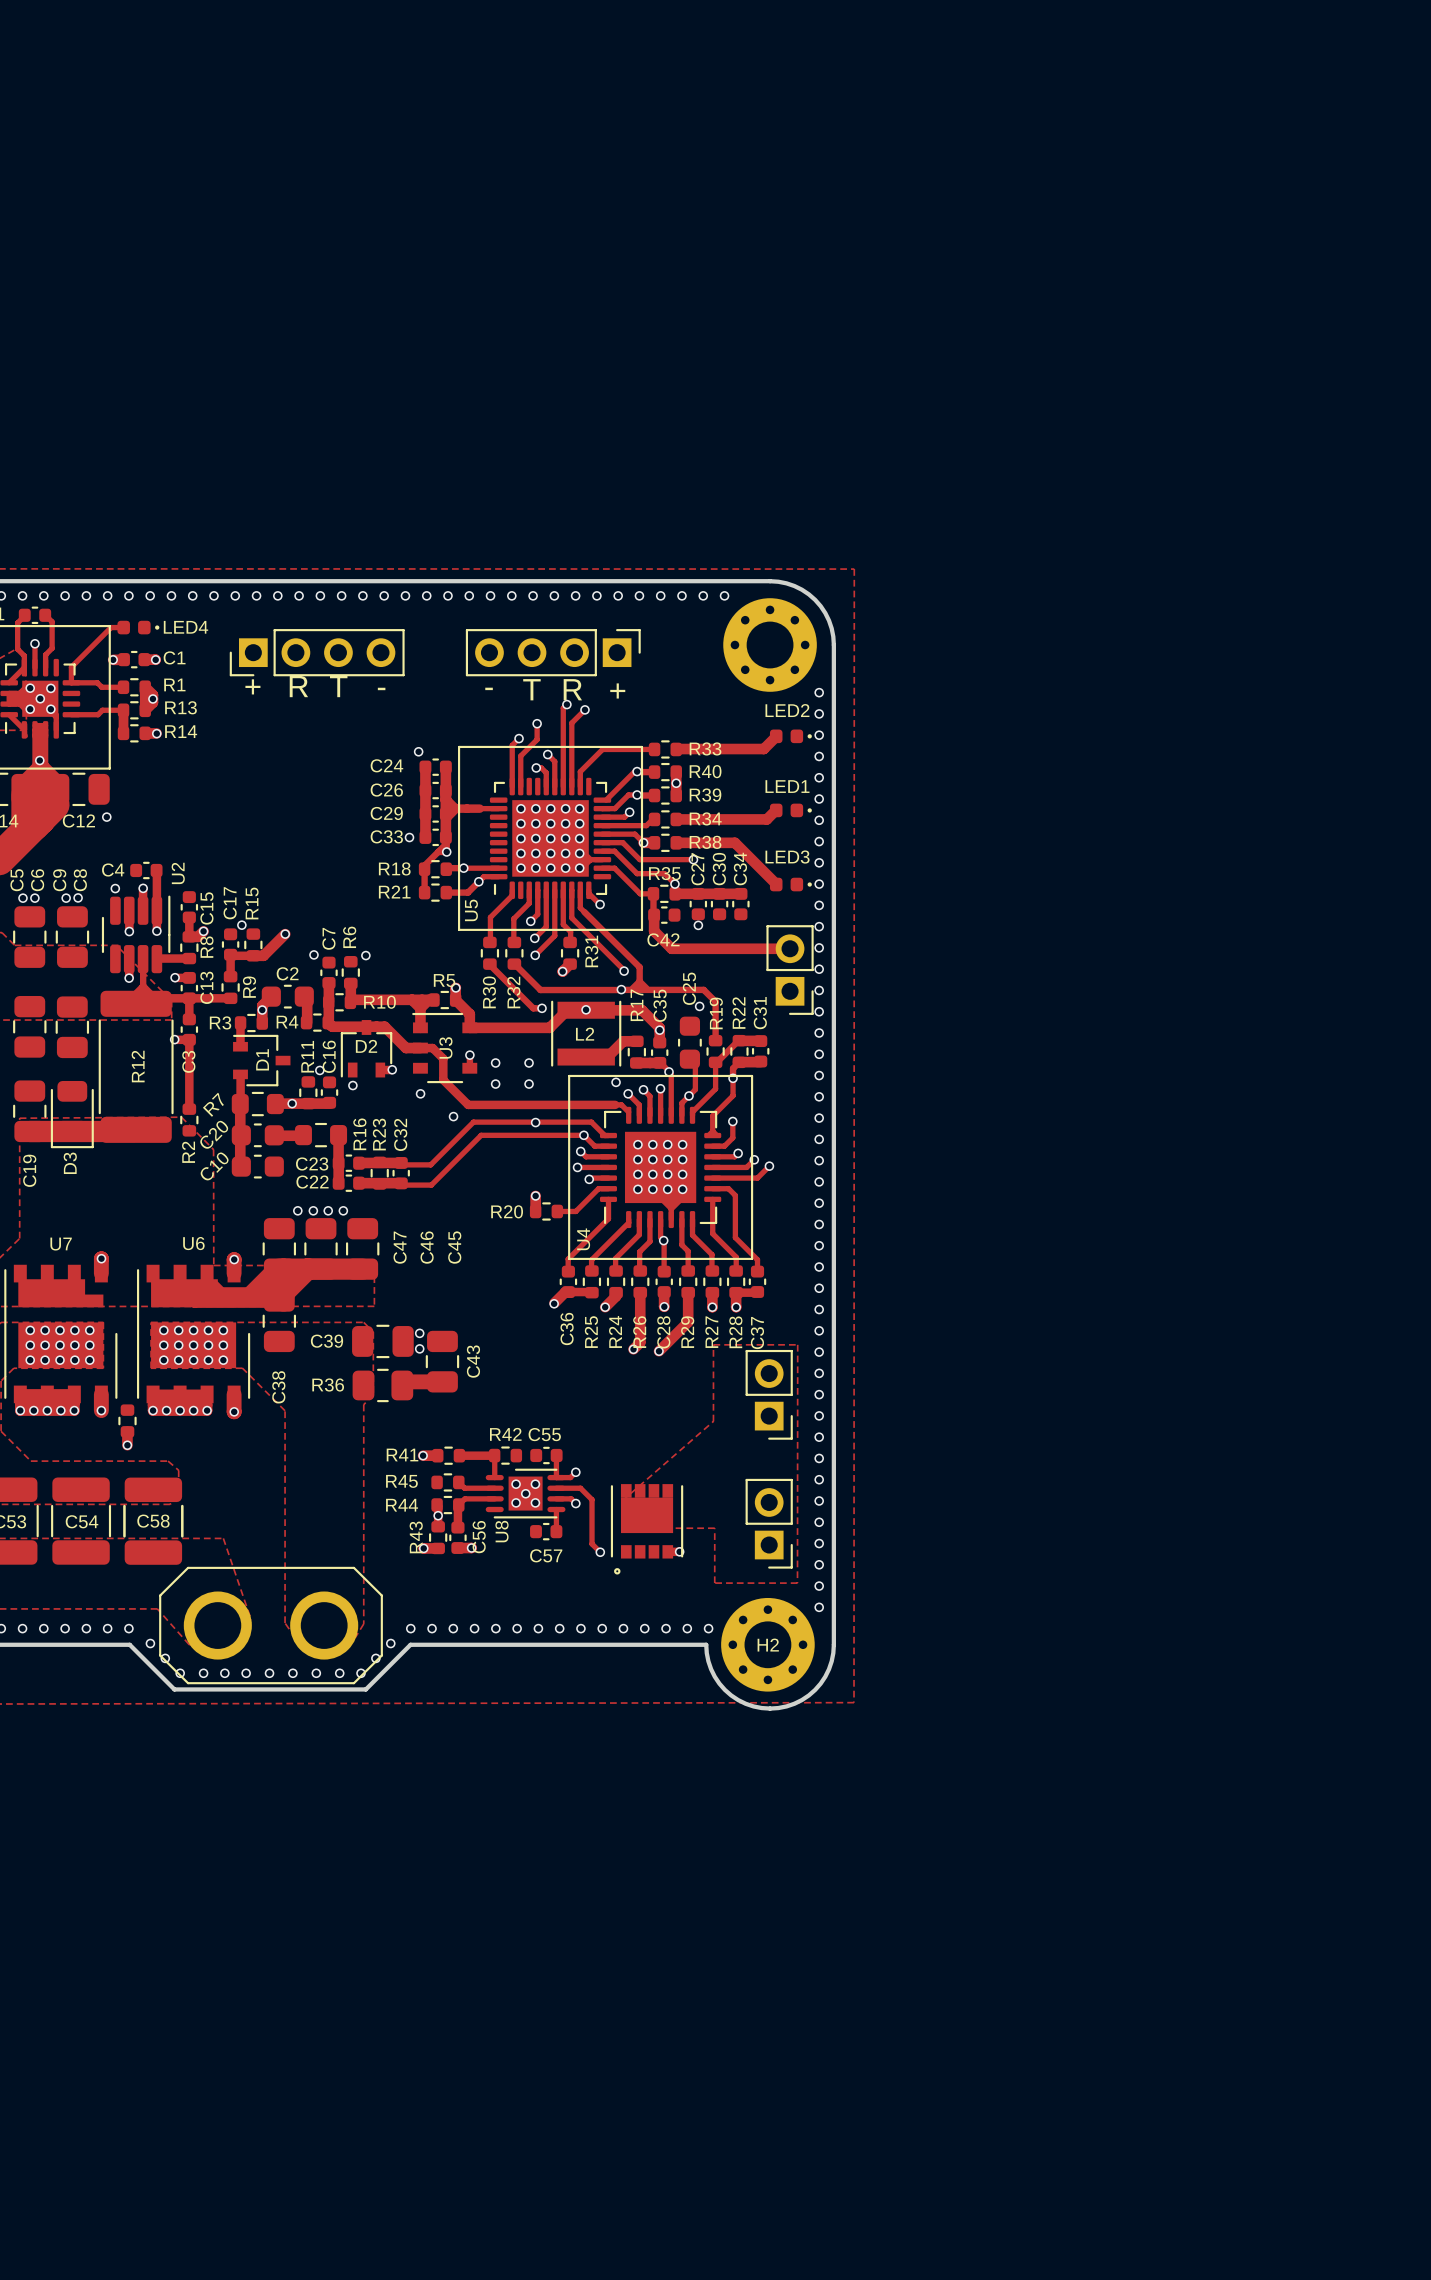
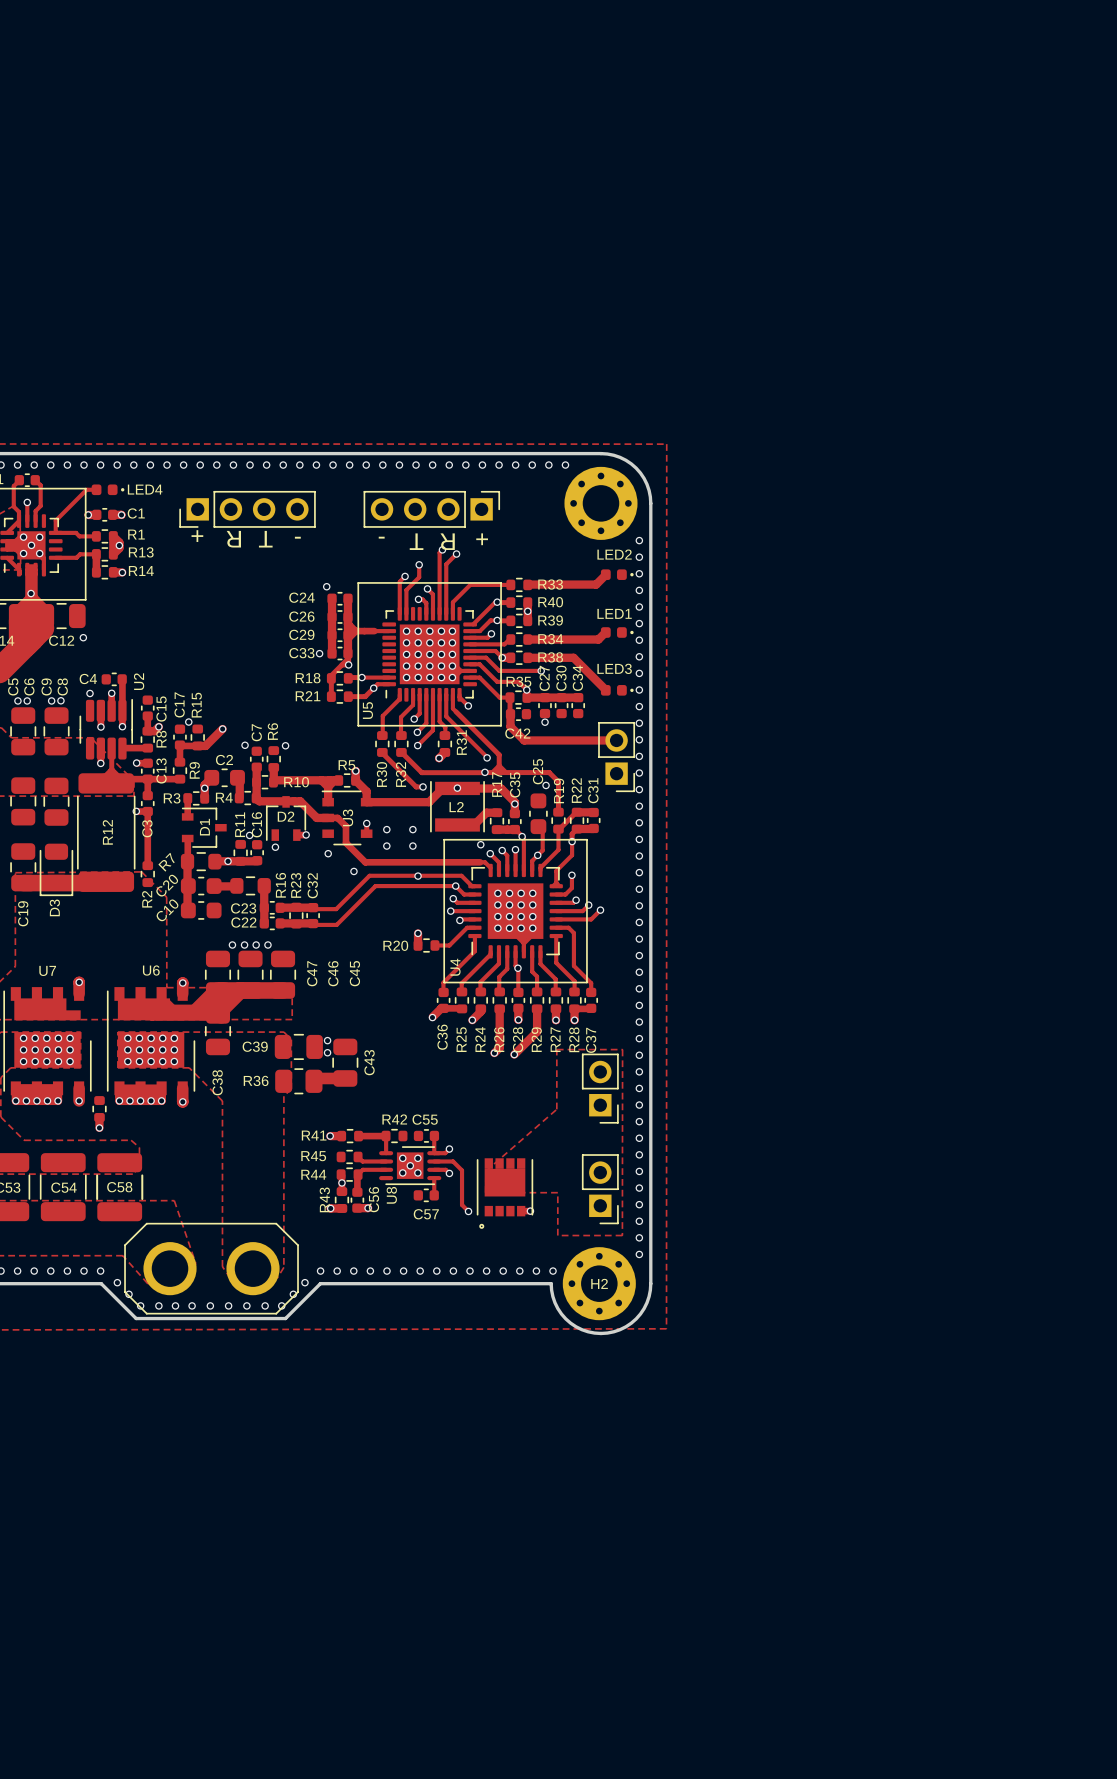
text rotation: 0° (298, 686) -> 180° (233, 539)
text rotation: 0° (338, 686) -> 180° (265, 539)
text rotation: 0° (531, 689) -> 180° (416, 541)
text rotation: 0° (572, 689) -> 180° (447, 541)

